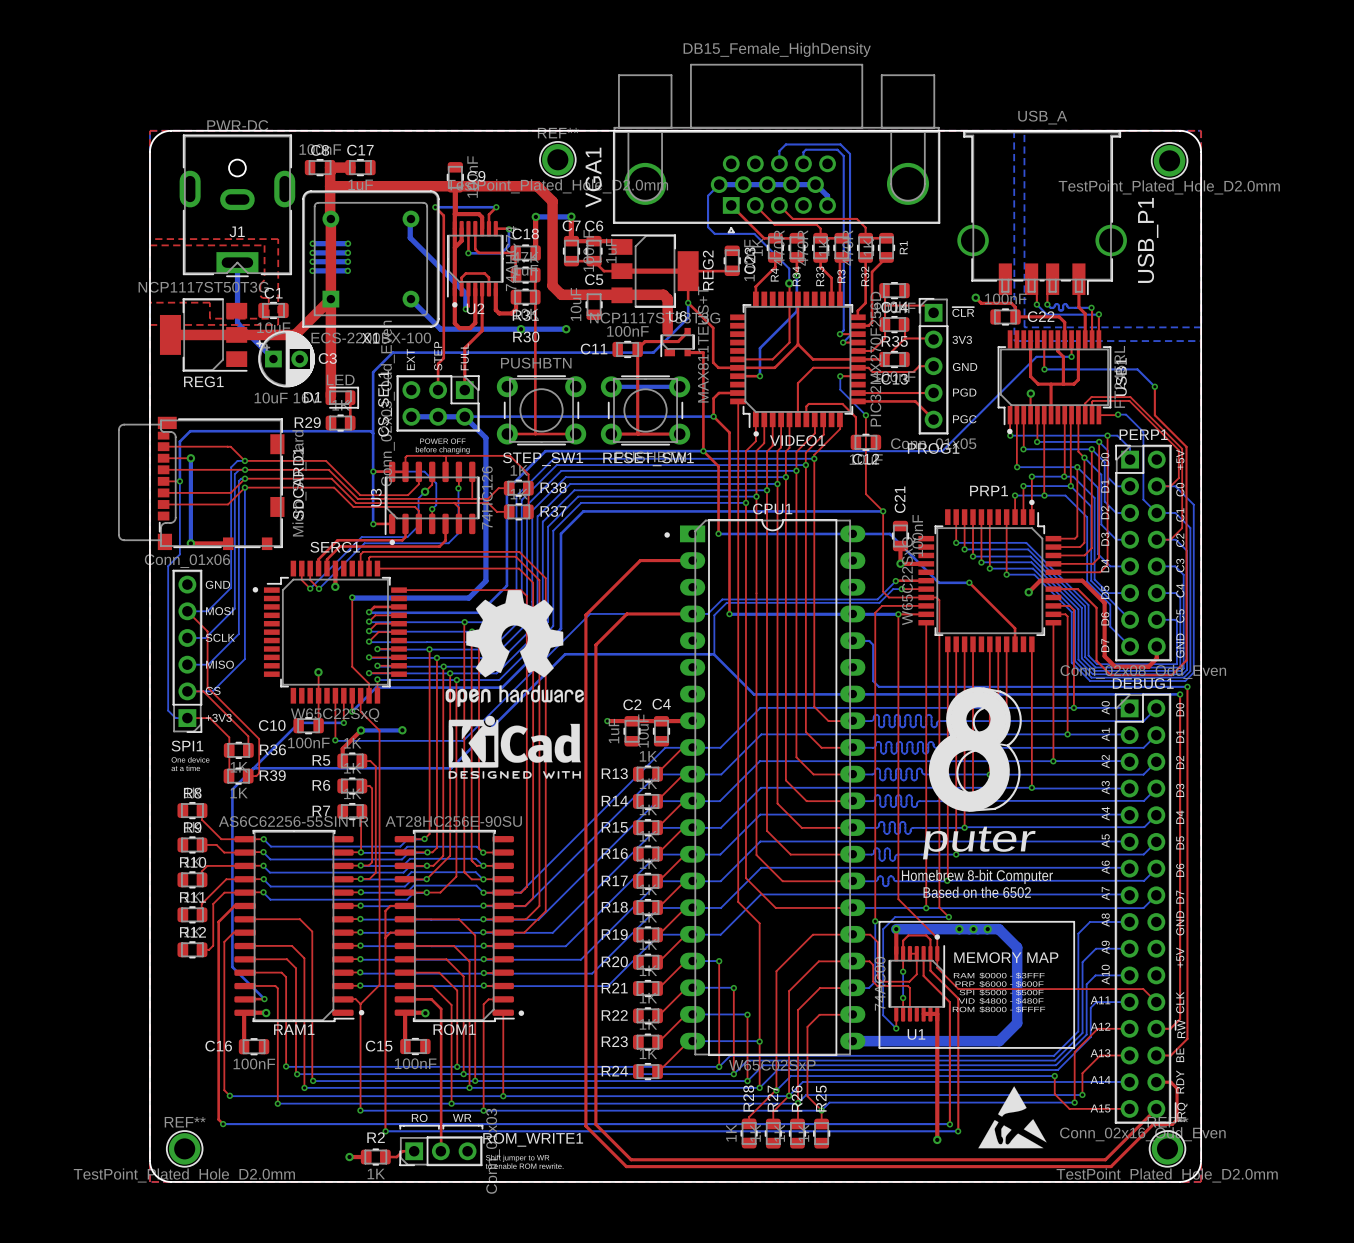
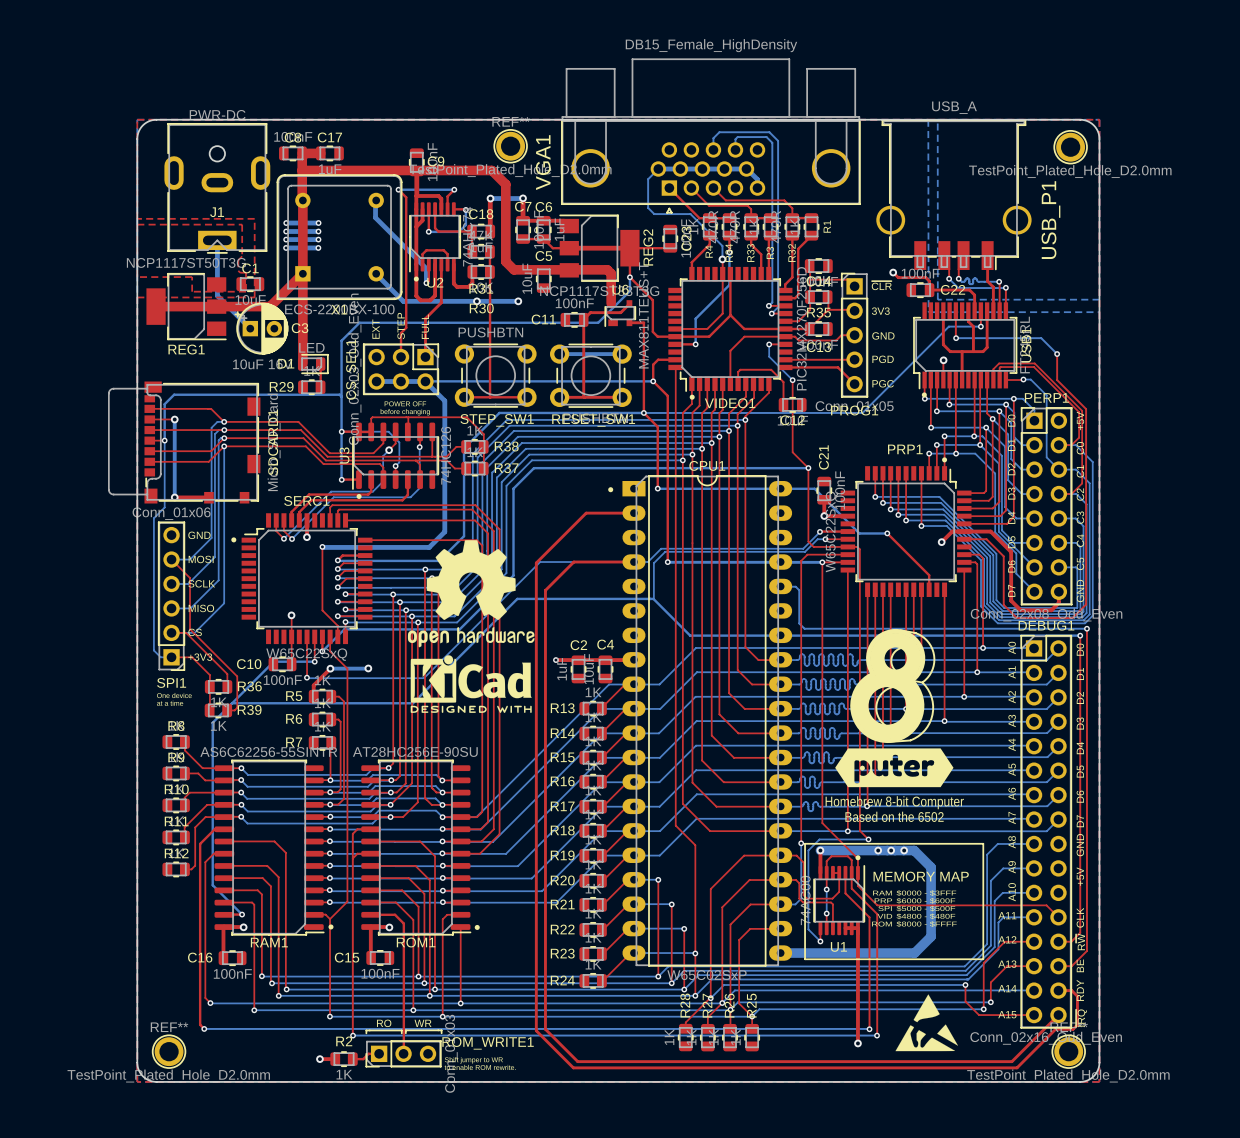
drawing: none -> [835, 748, 954, 788]
text: puter (979, 843) -> none

